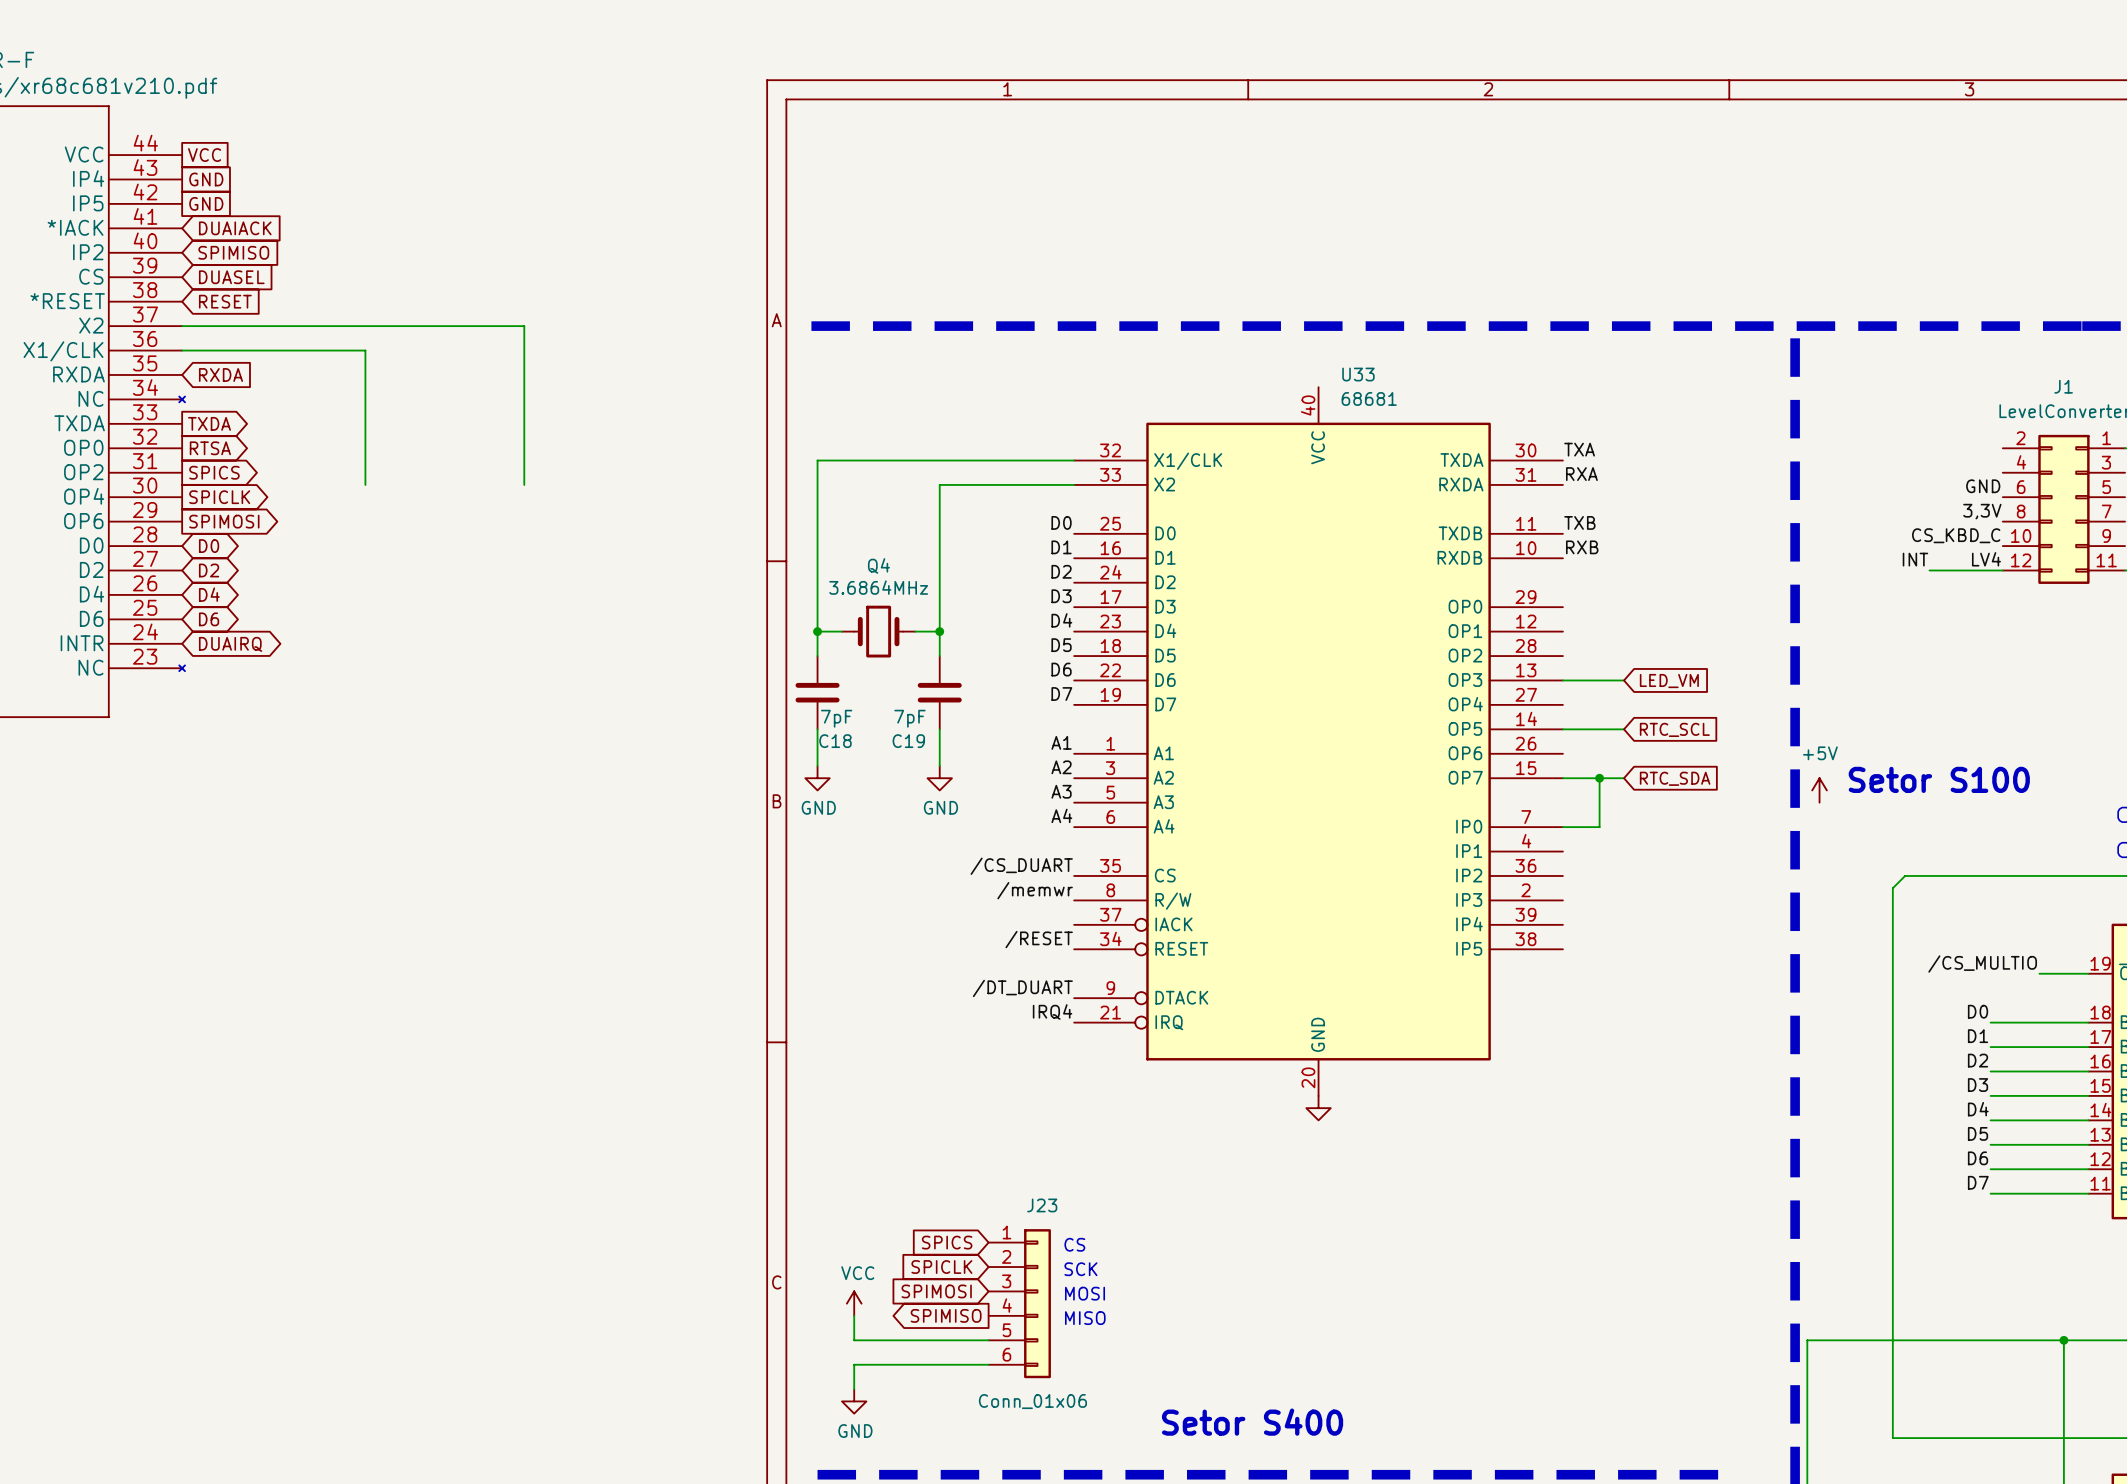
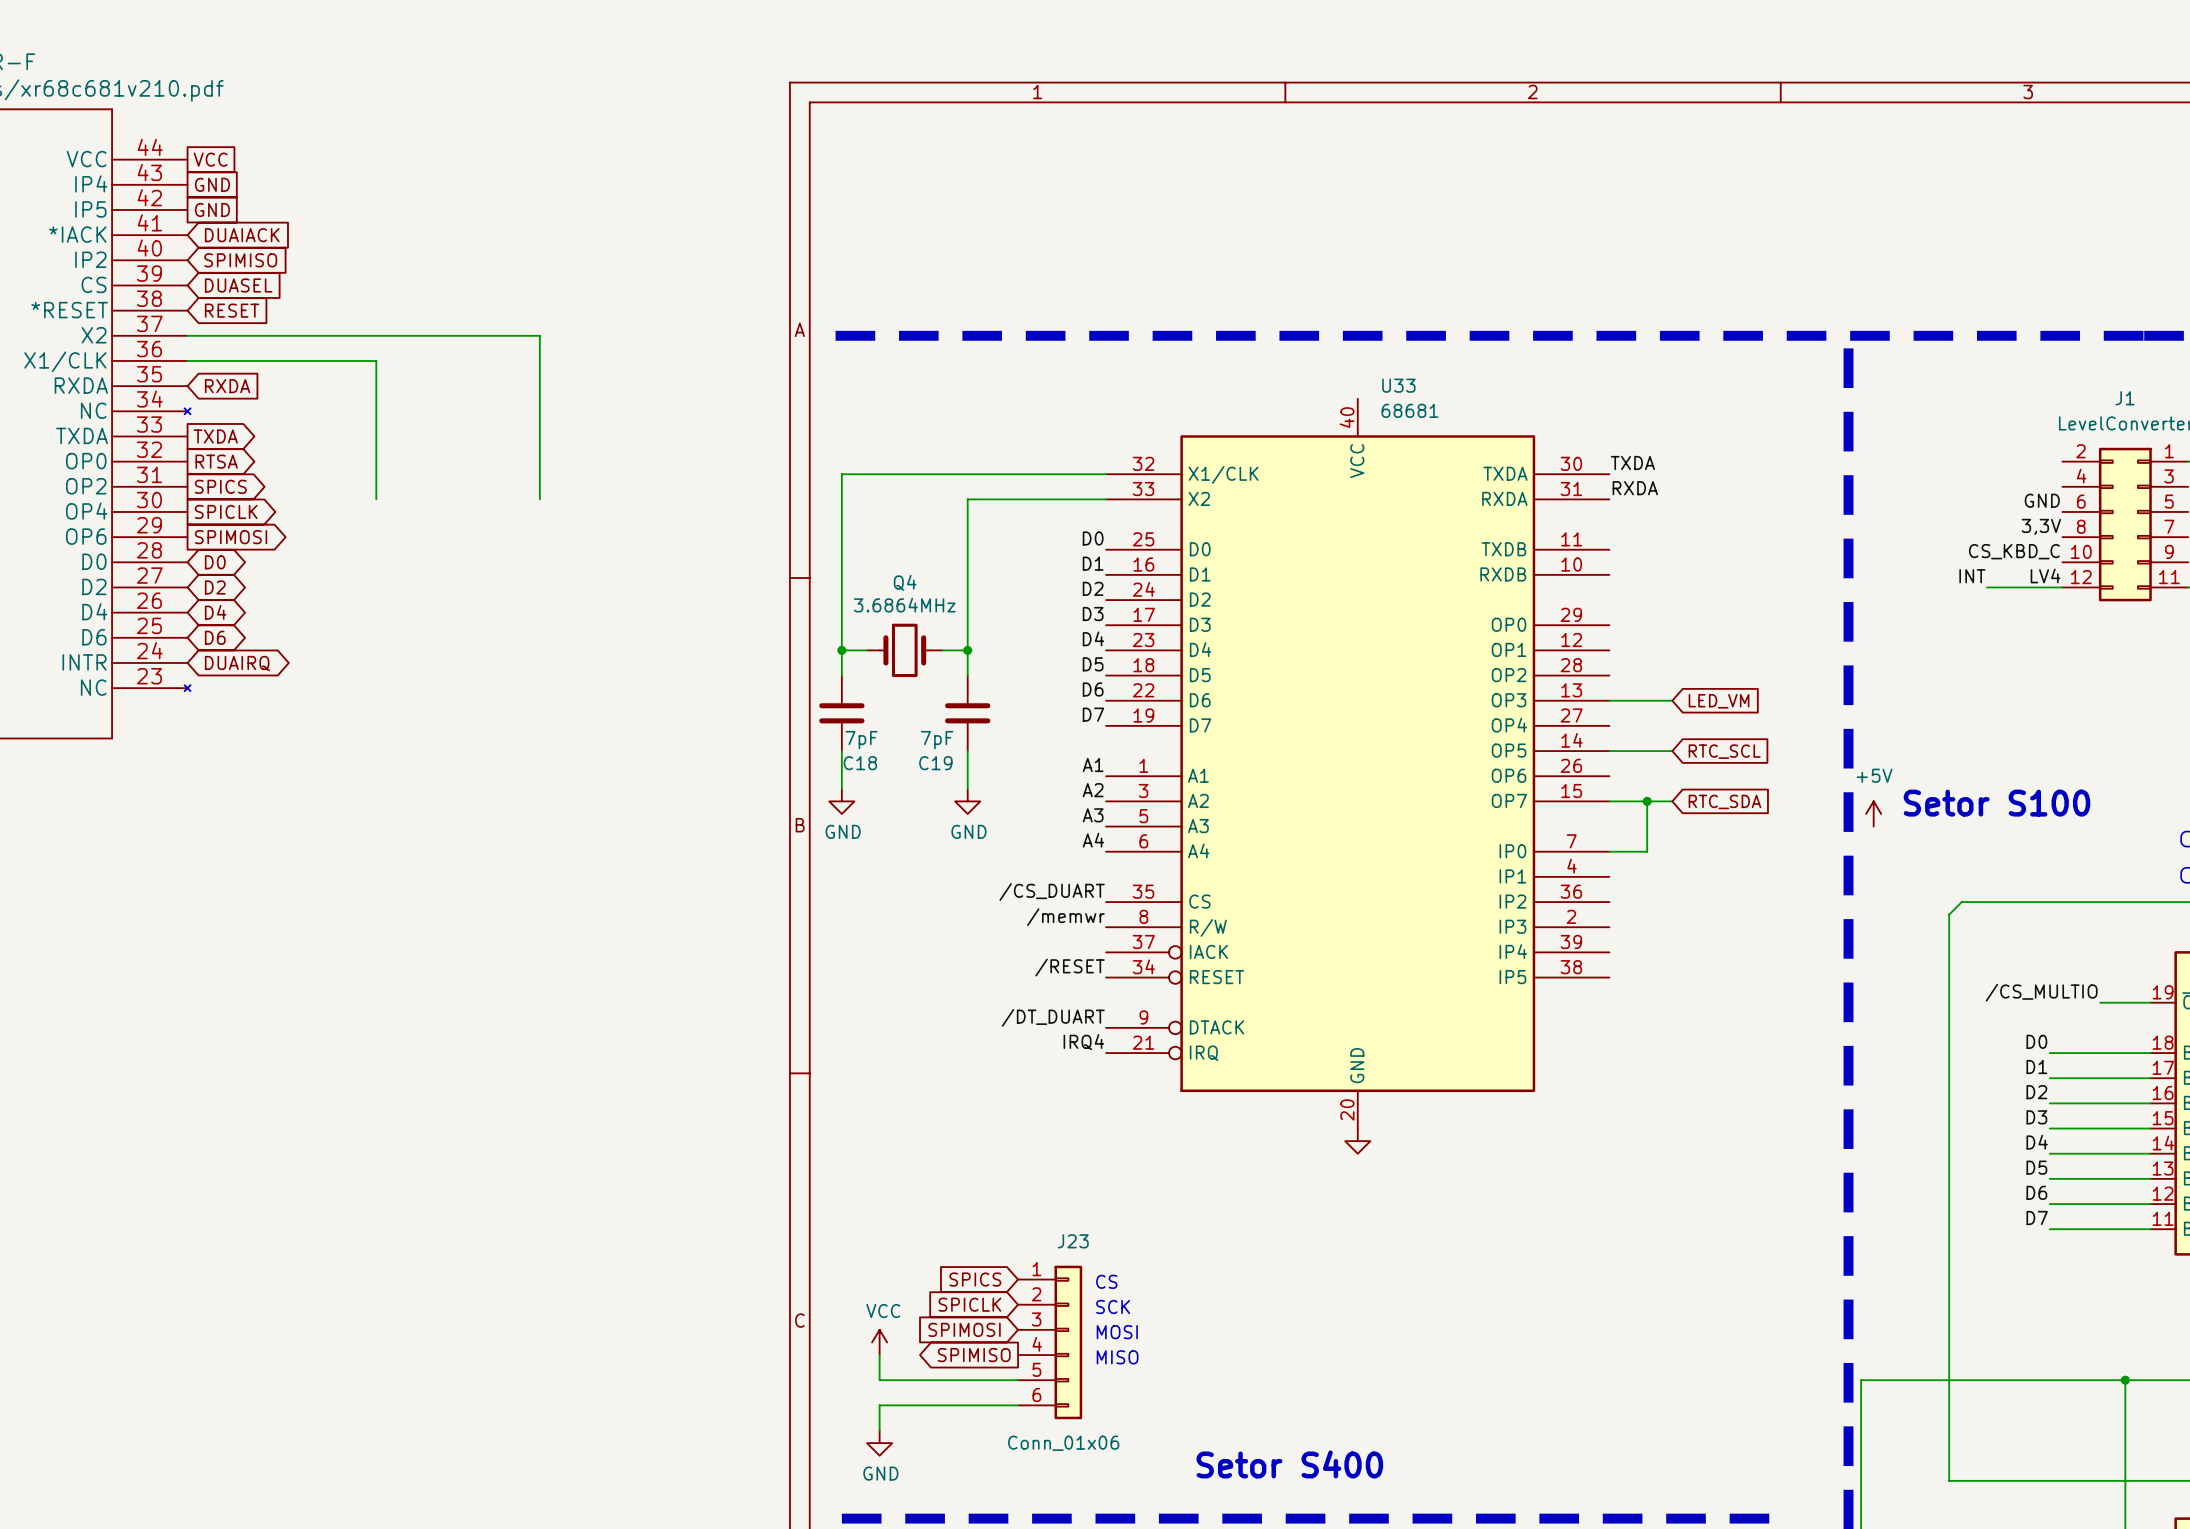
label: TXA (1579, 449) -> TXDA (1632, 463)
label: RXA (1581, 474) -> RXDA (1635, 488)
label: TXB (1579, 522) -> none
label: RXB (1582, 547) -> none

